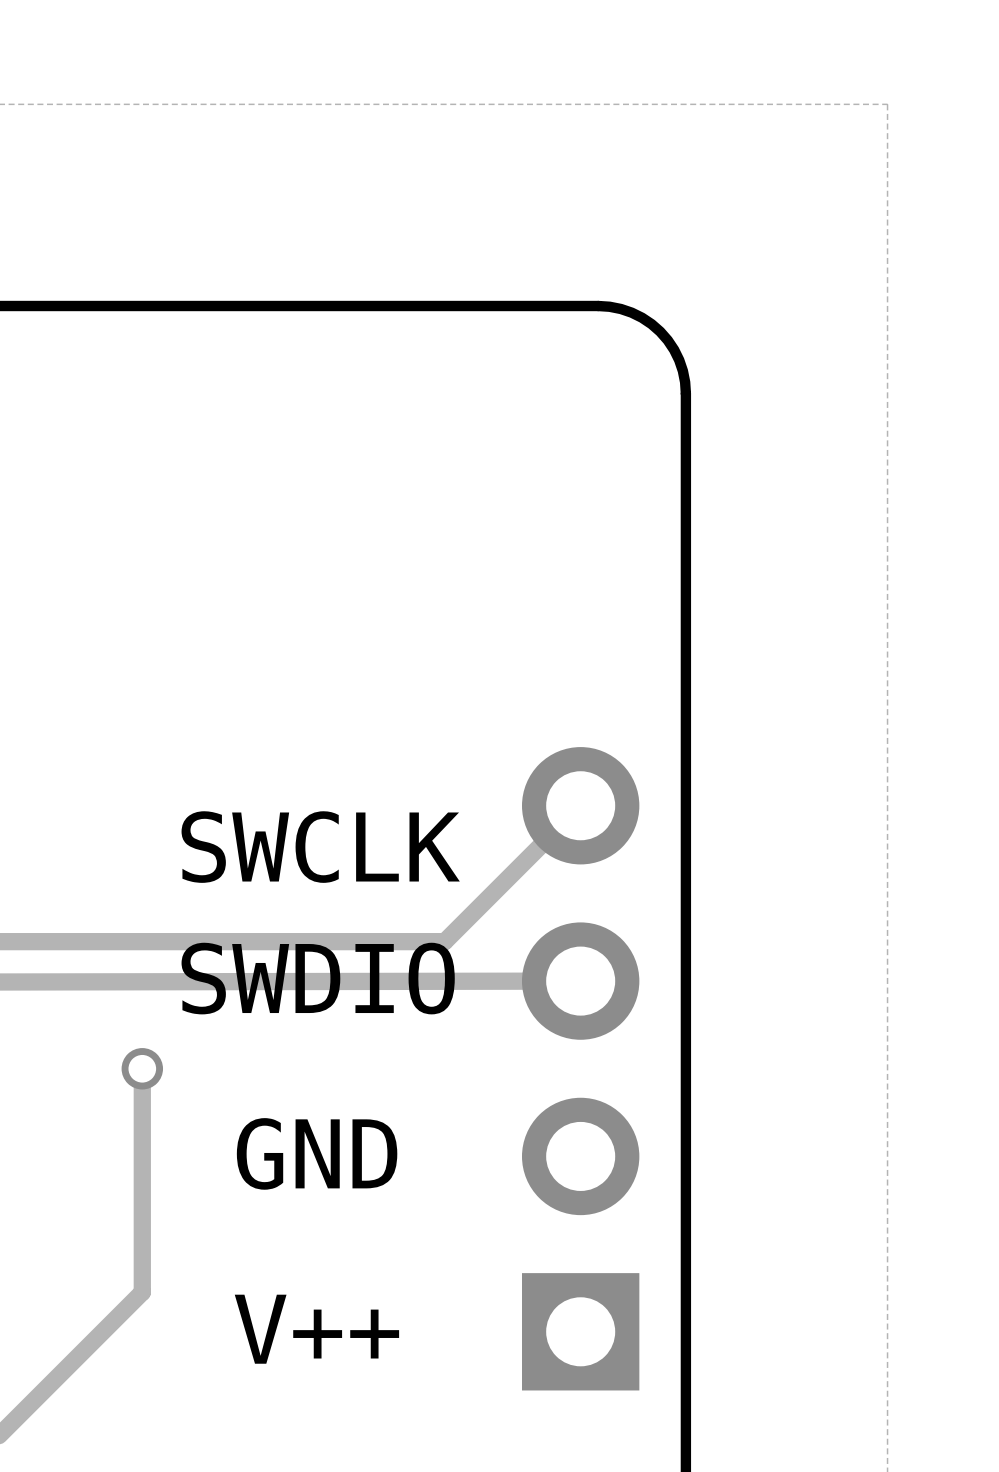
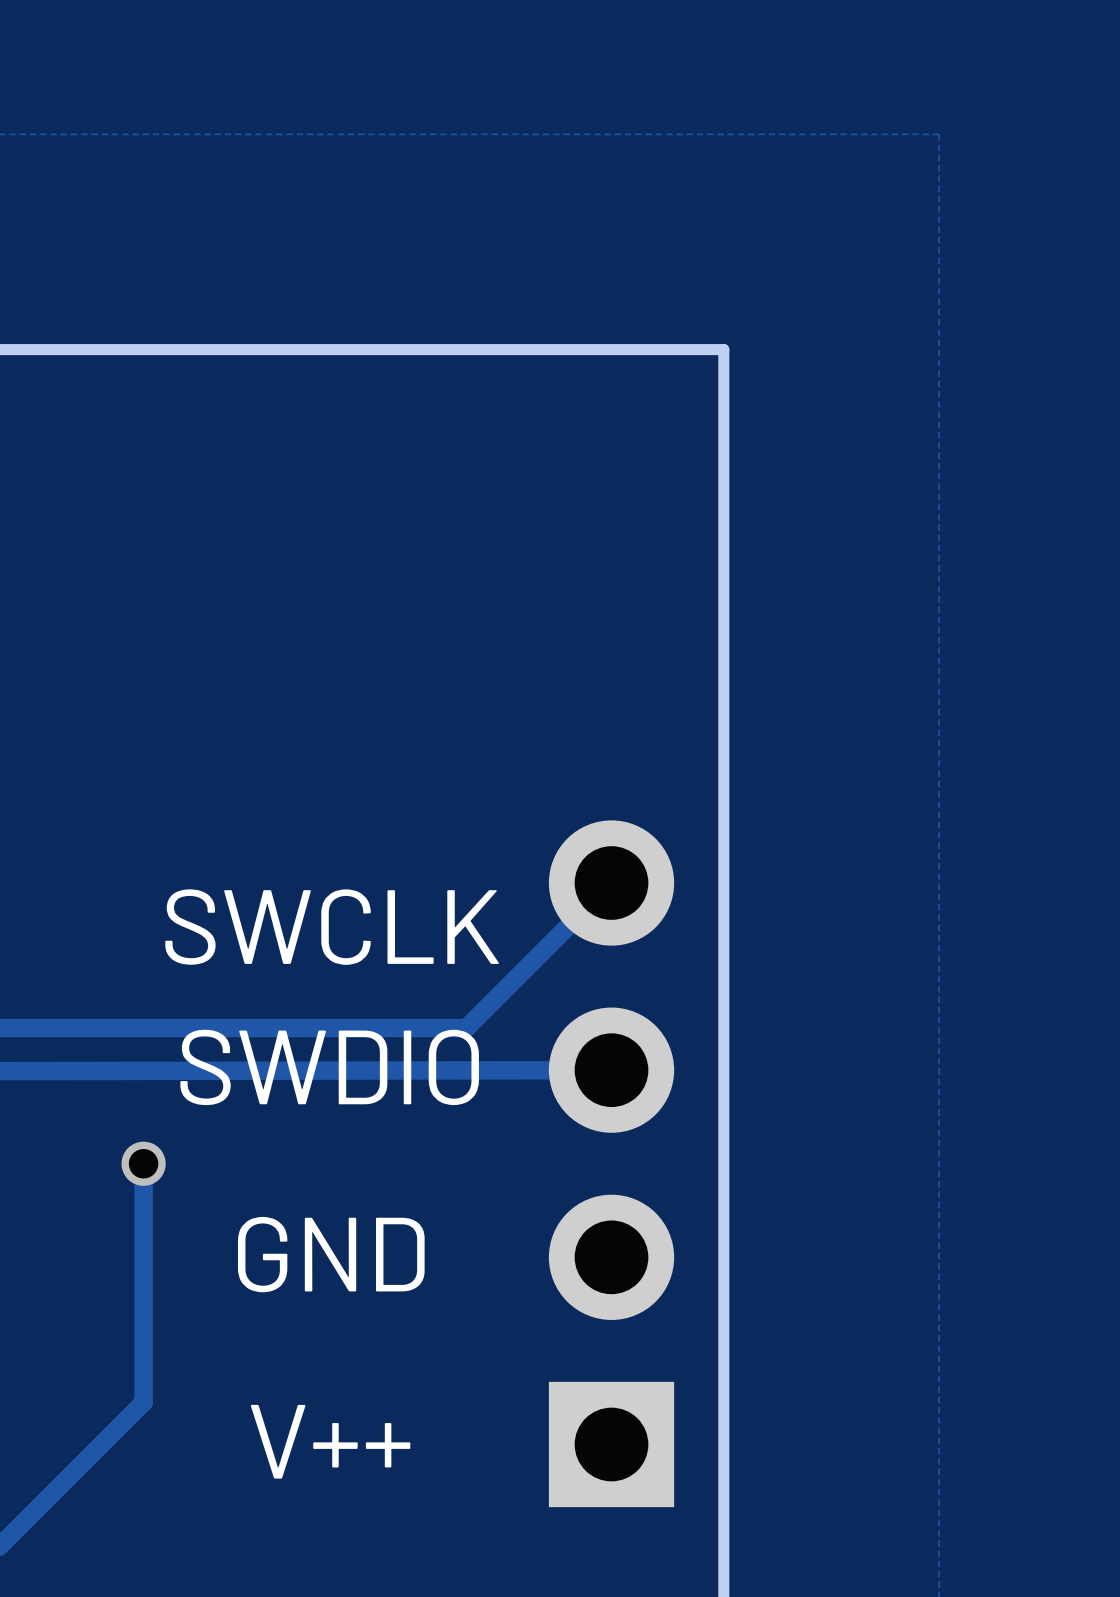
board edge: (598, 306) (631, 312) (660, 331) (679, 360) (685, 393) -> (630, 349) (723, 349) (723, 443)

